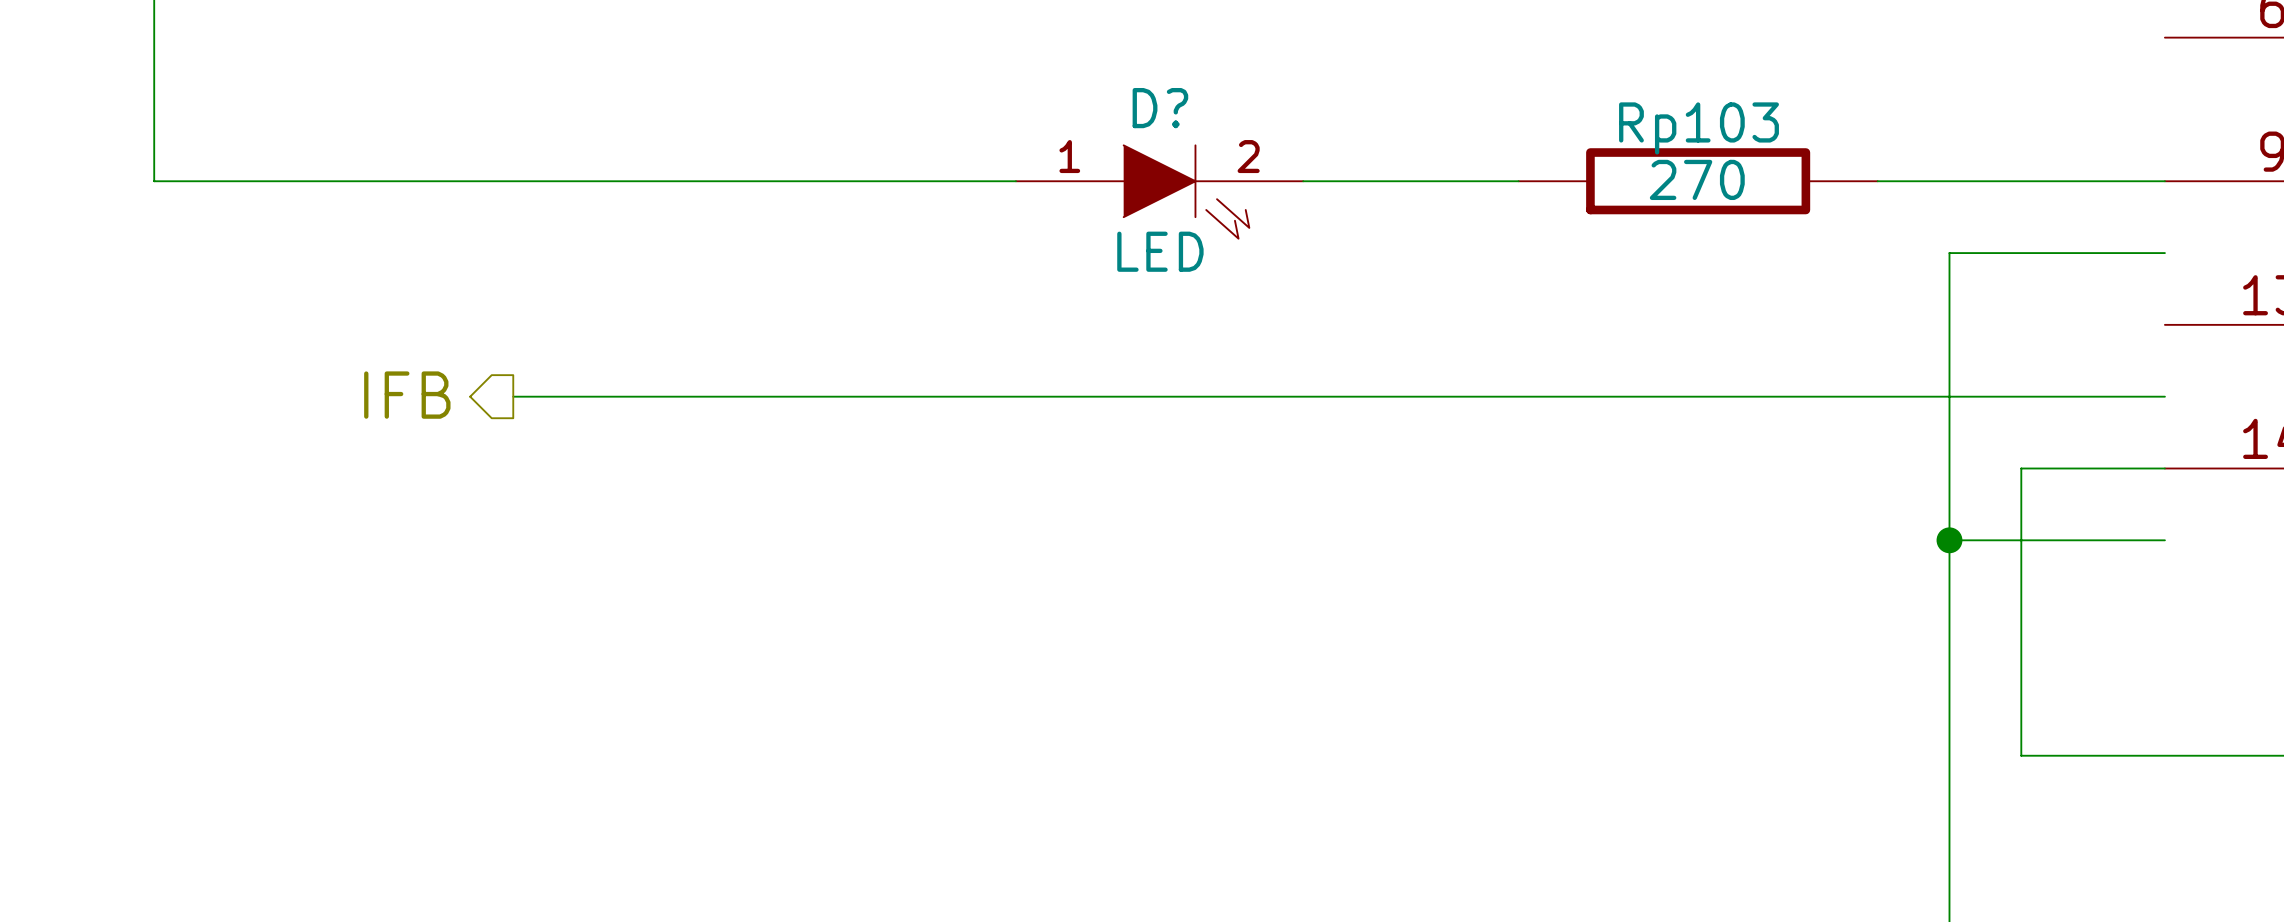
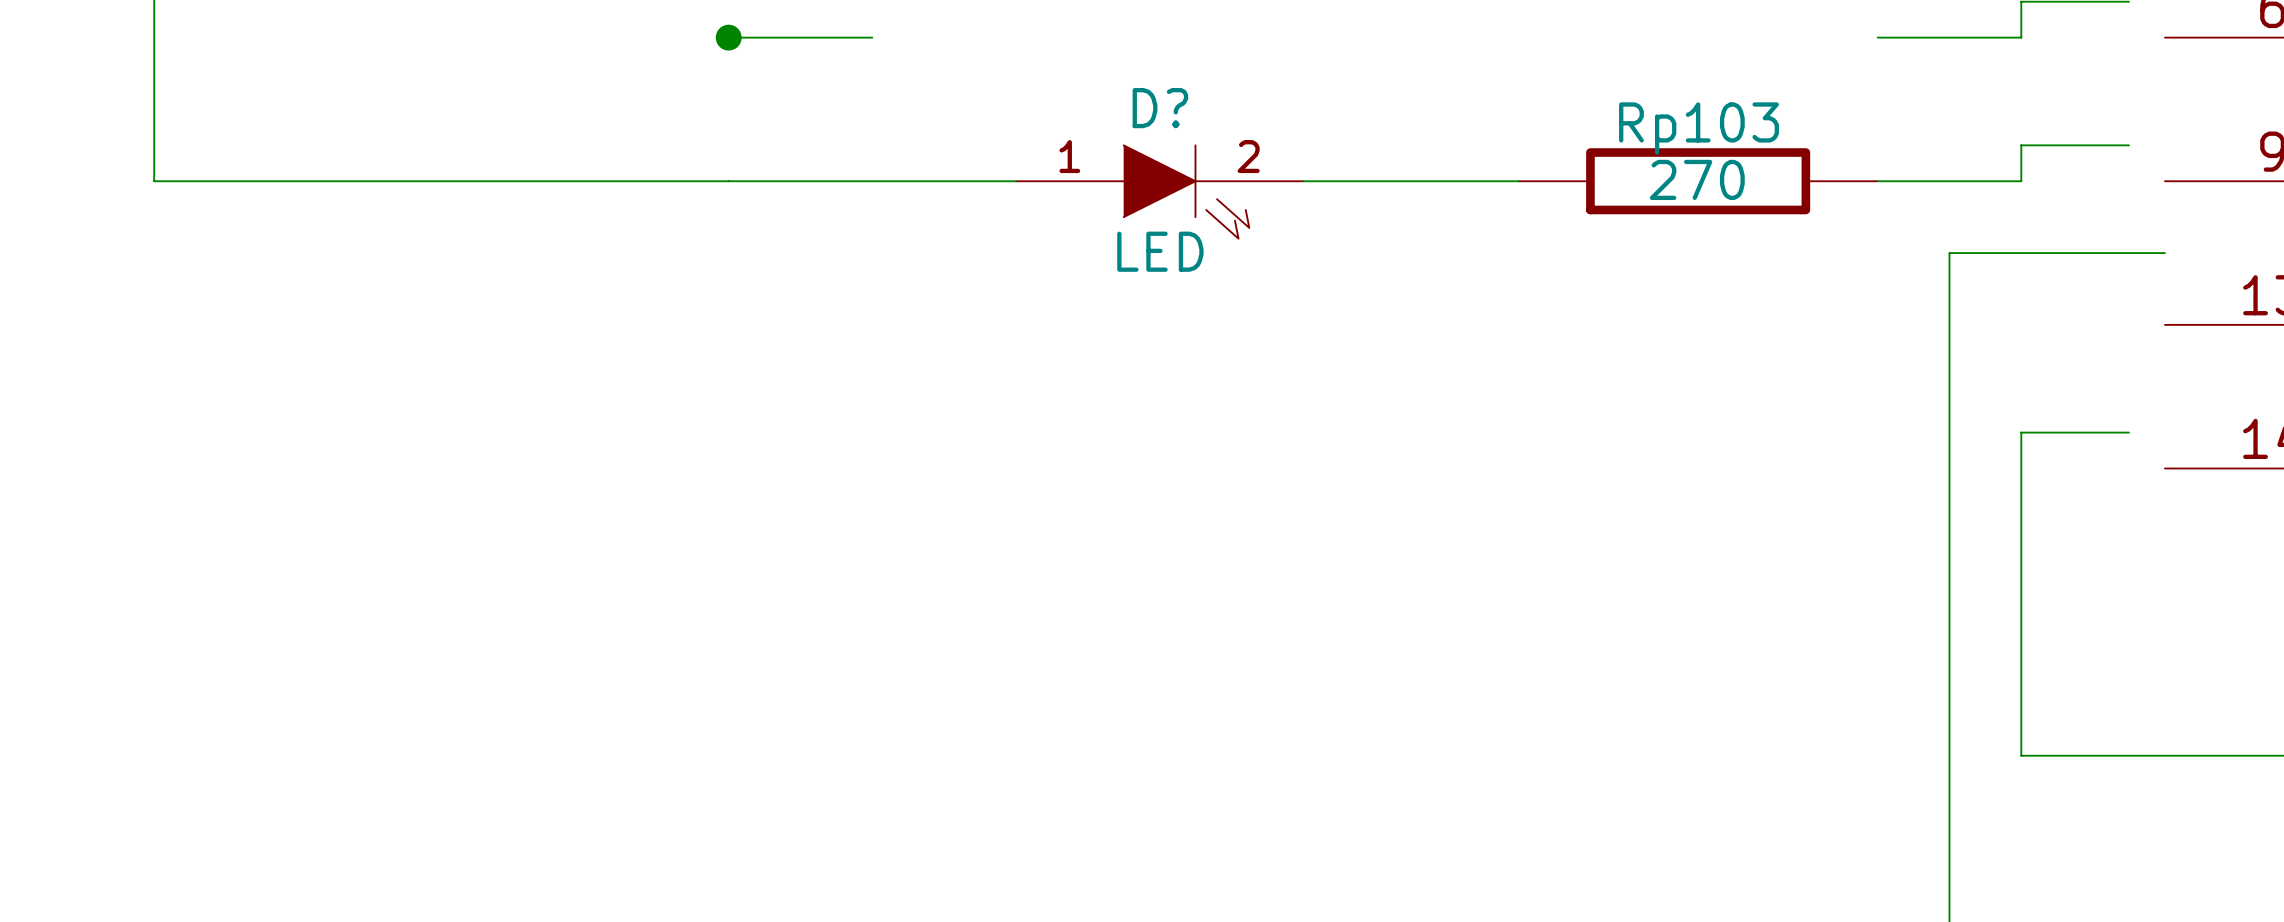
wire: none -> (2129, 1) (2021, 1) (2021, 37) (1877, 37)
wire: none -> (728, 37) (872, 37)
junction: none -> (728, 37)
wire: (2021, 181) (2164, 181) -> (2021, 181) (2021, 145) (2129, 145)
hierarchical label: IFB (407, 395) -> none
wire: (513, 396) (2164, 396) -> none
wire: (2021, 468) (2164, 468) -> (2021, 468) (2021, 432) (2129, 432)
wire: (1949, 540) (2164, 540) -> none
junction: (1949, 540) -> none

